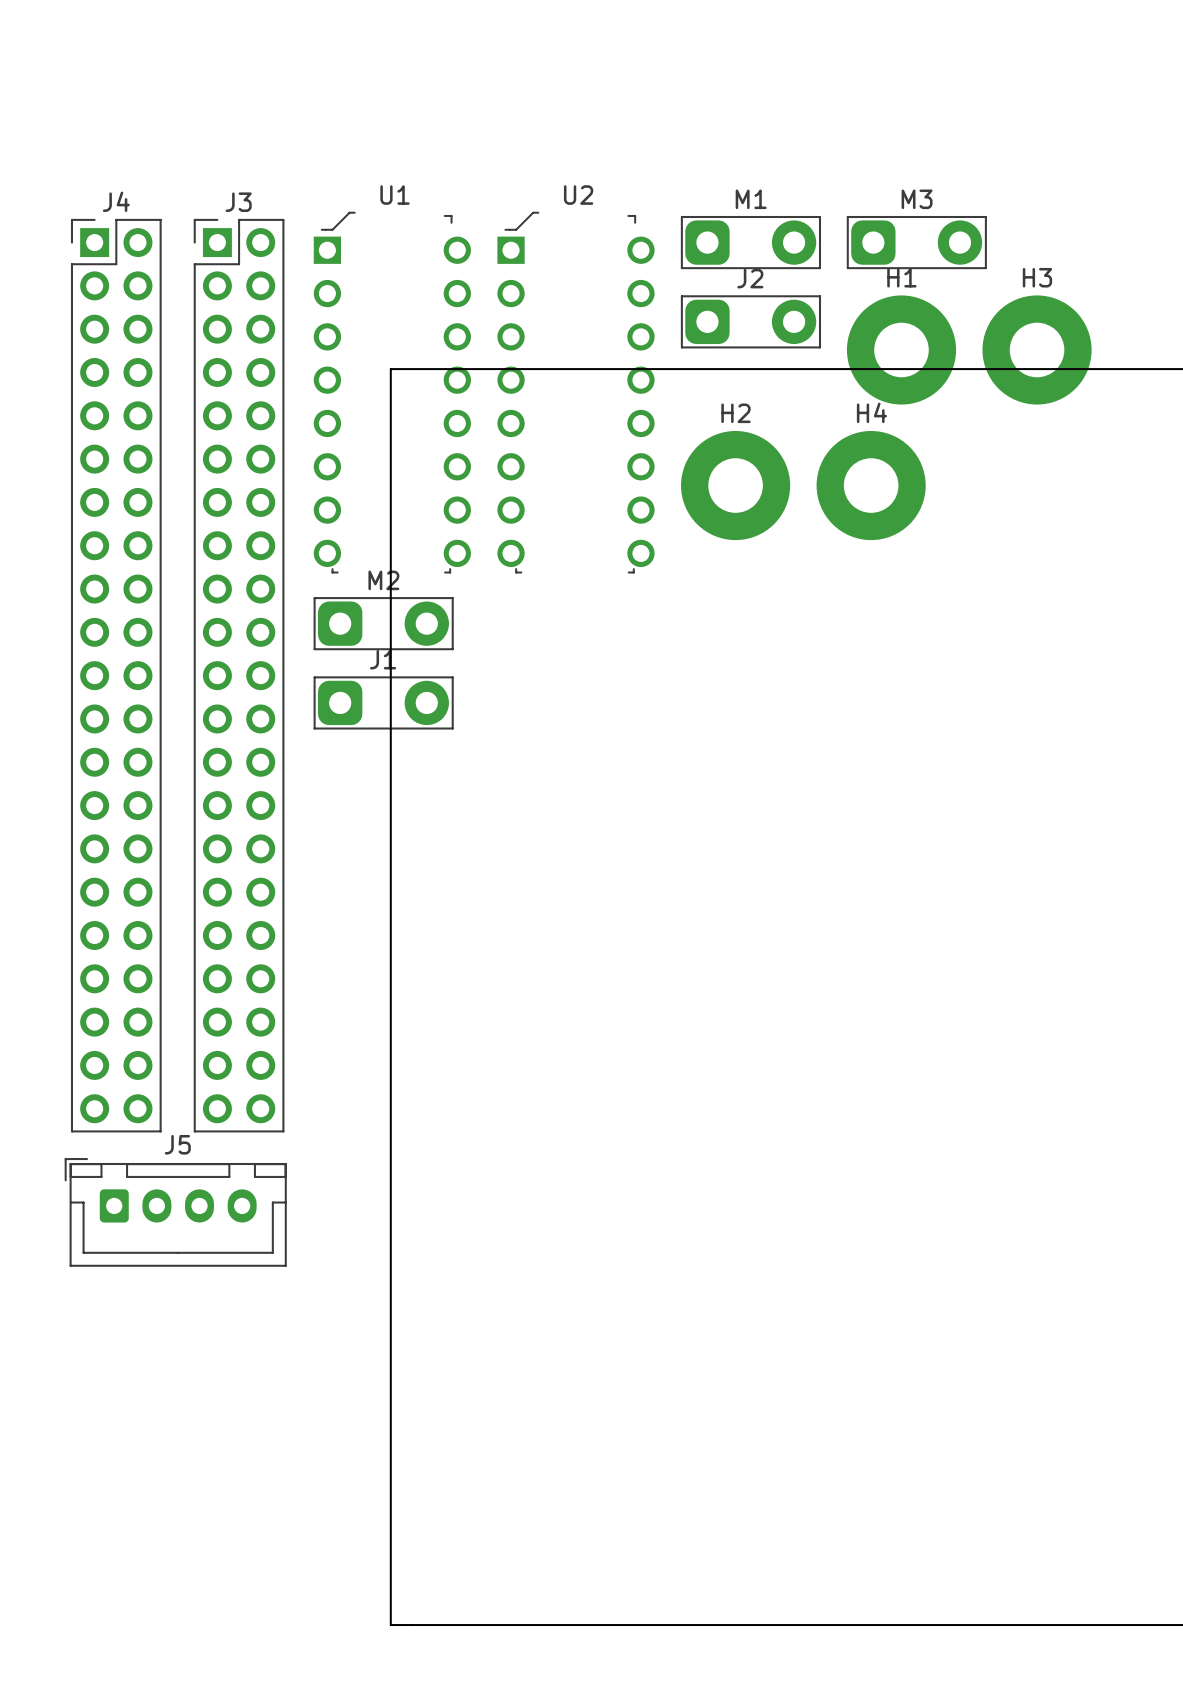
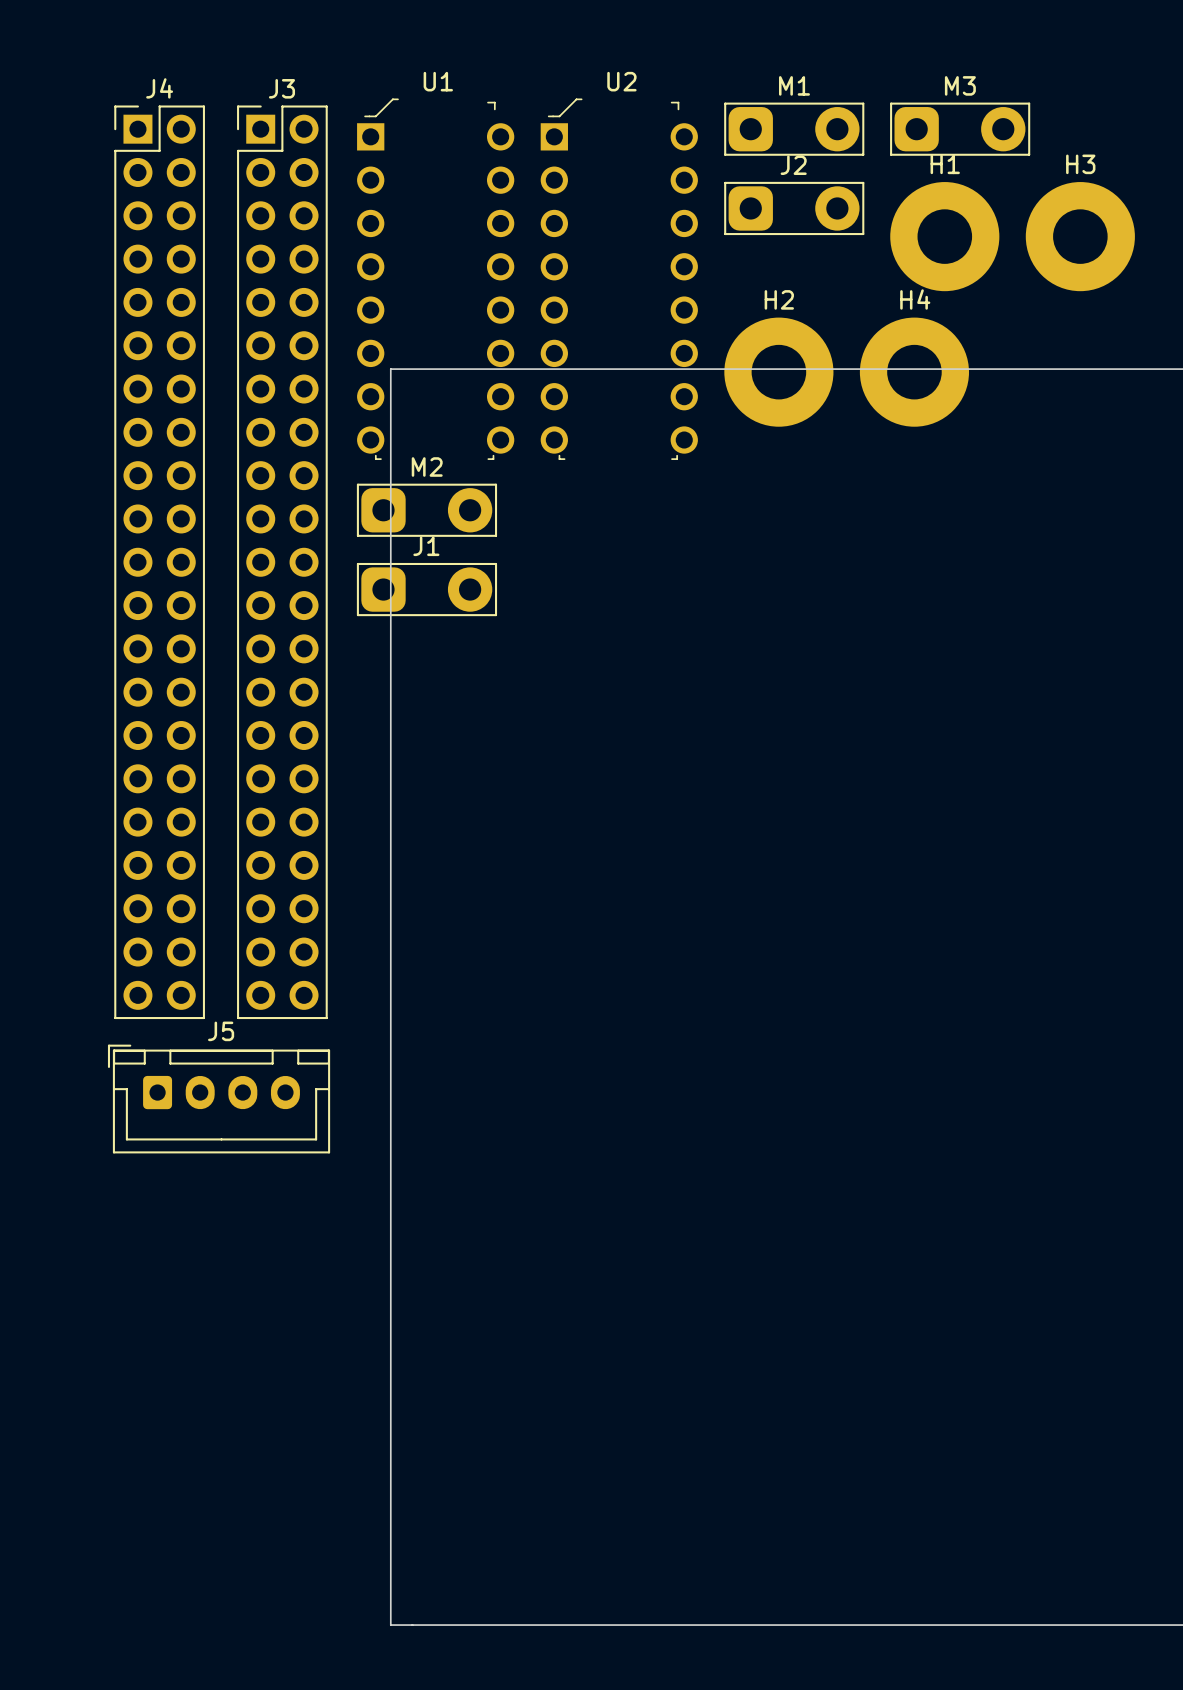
M1 position: (750, 242) -> (794, 129)
M3 position: (916, 242) -> (960, 129)
J2 position: (750, 321) -> (794, 208)
H1 position: (901, 349) -> (944, 236)
H3 position: (1037, 349) -> (1080, 236)
U1 position: (392, 392) -> (435, 279)
U2 position: (575, 392) -> (619, 279)
H2 position: (735, 485) -> (778, 372)
H4 position: (871, 485) -> (914, 372)
M2 position: (383, 623) -> (426, 510)
J4 position: (116, 675) -> (159, 562)
J3 position: (239, 675) -> (282, 562)
J1 position: (383, 702) -> (426, 589)
J5 position: (175, 1212) -> (219, 1099)

